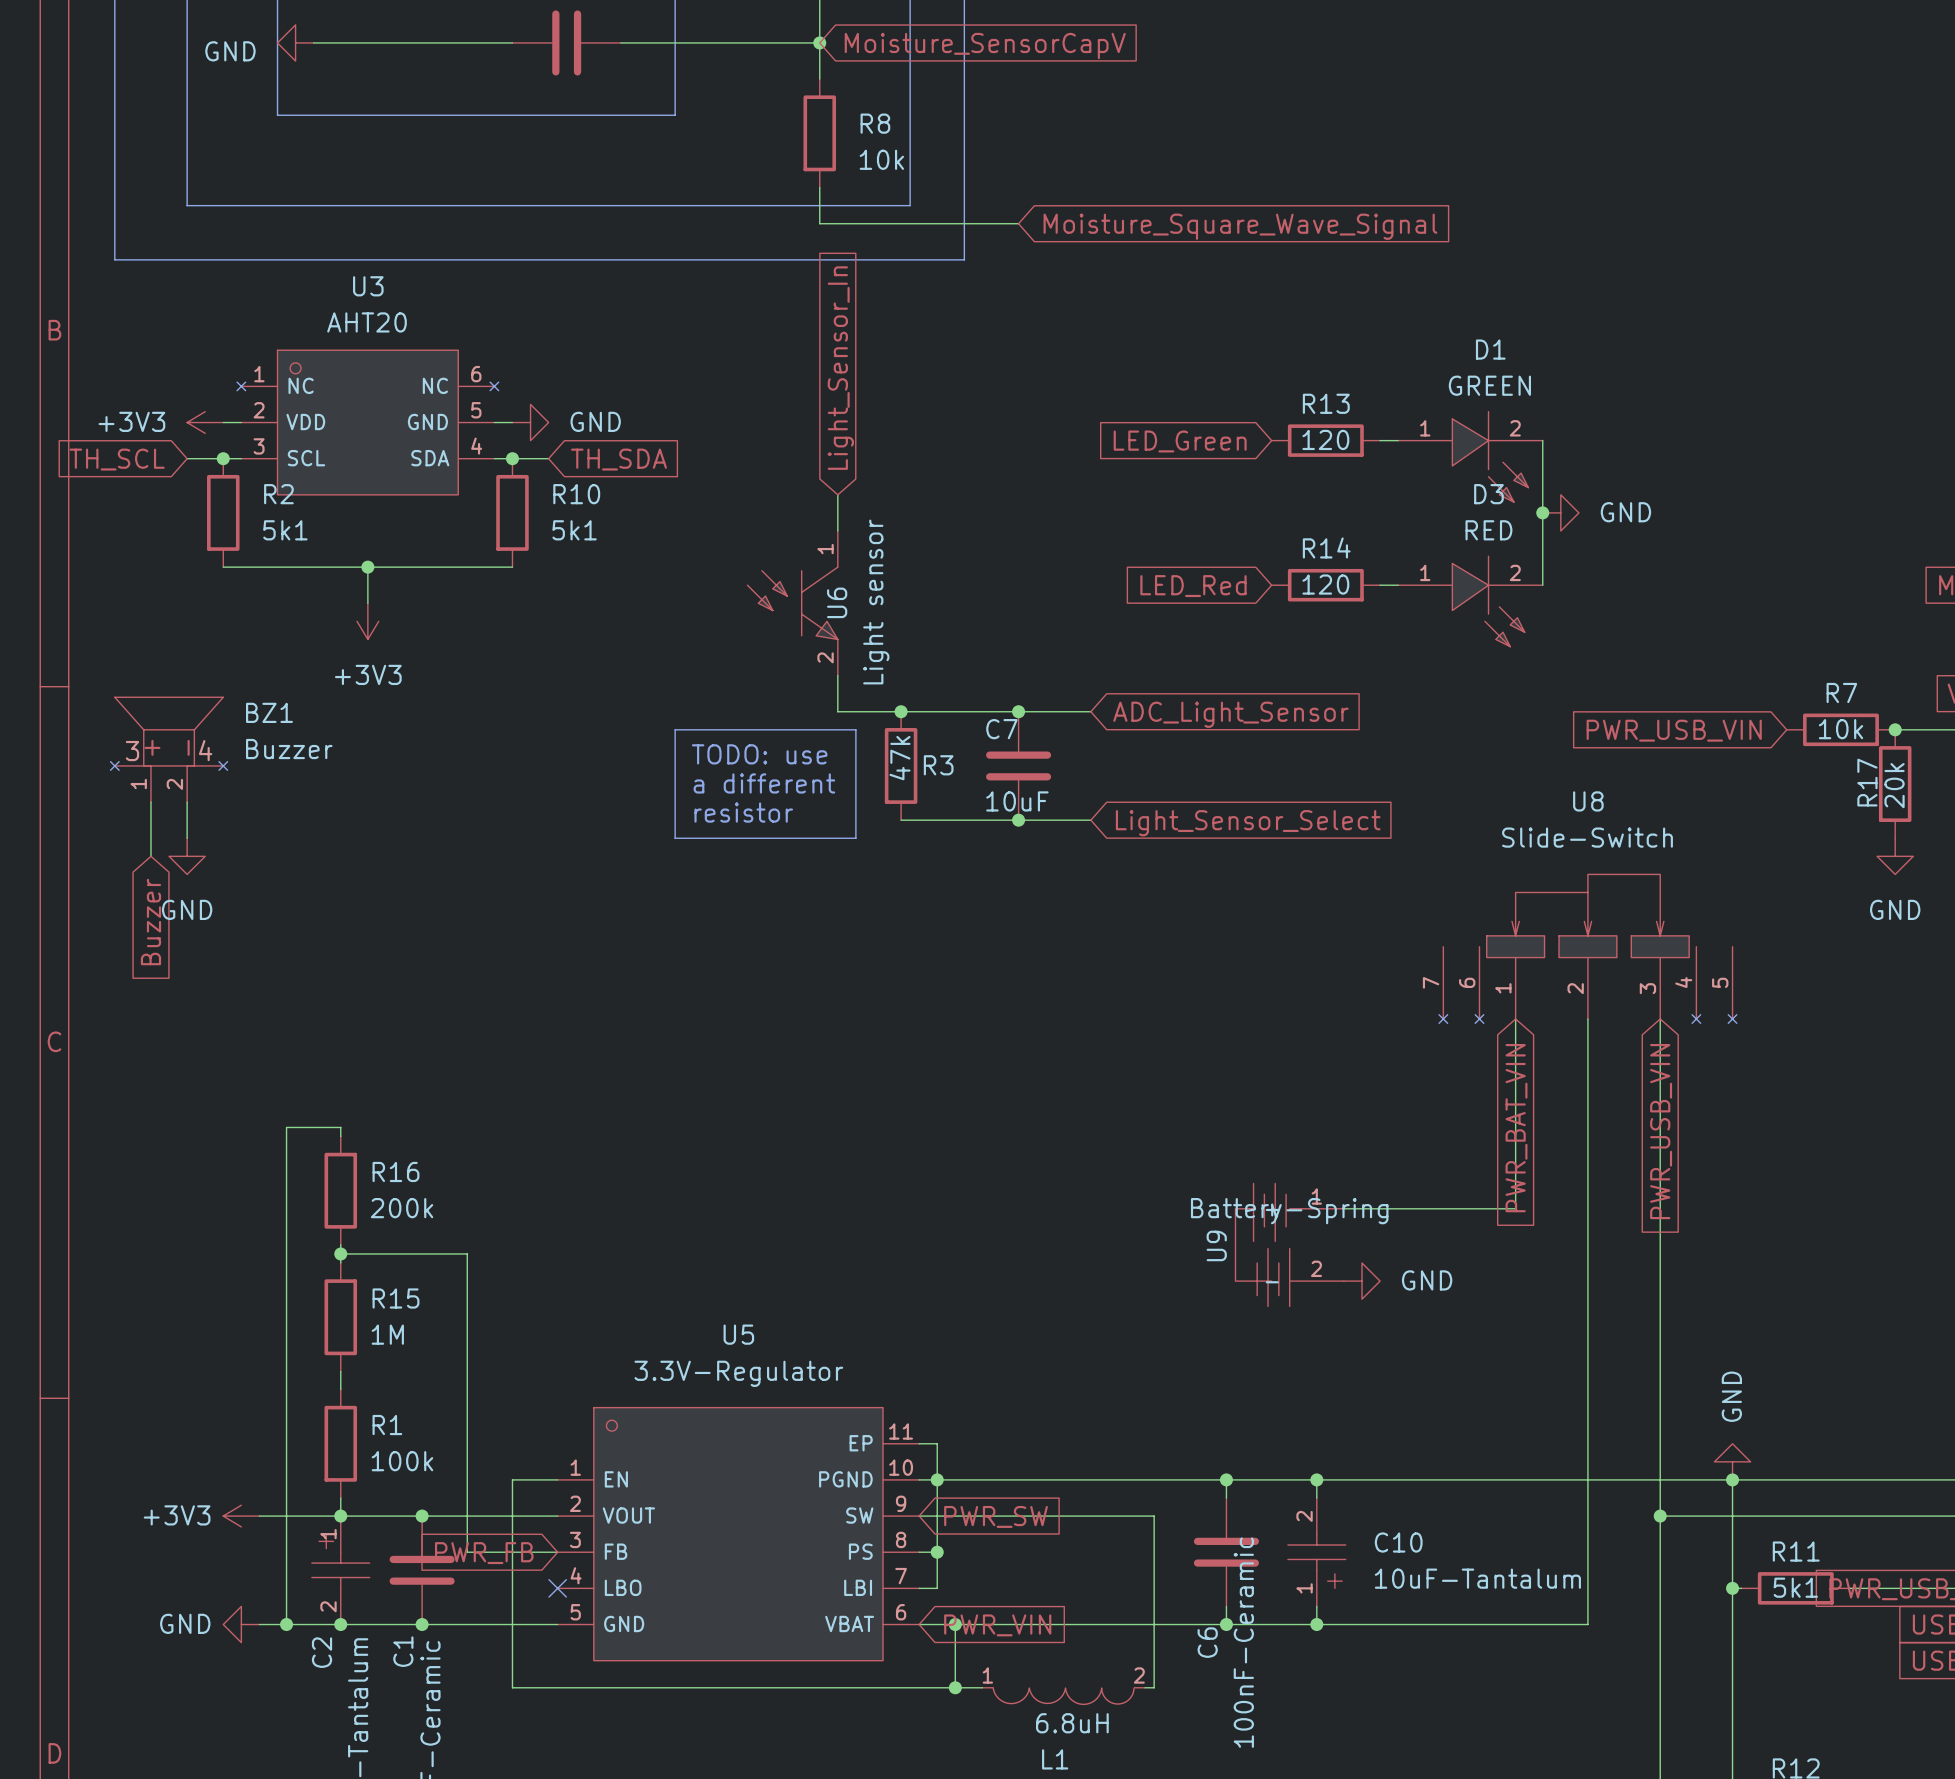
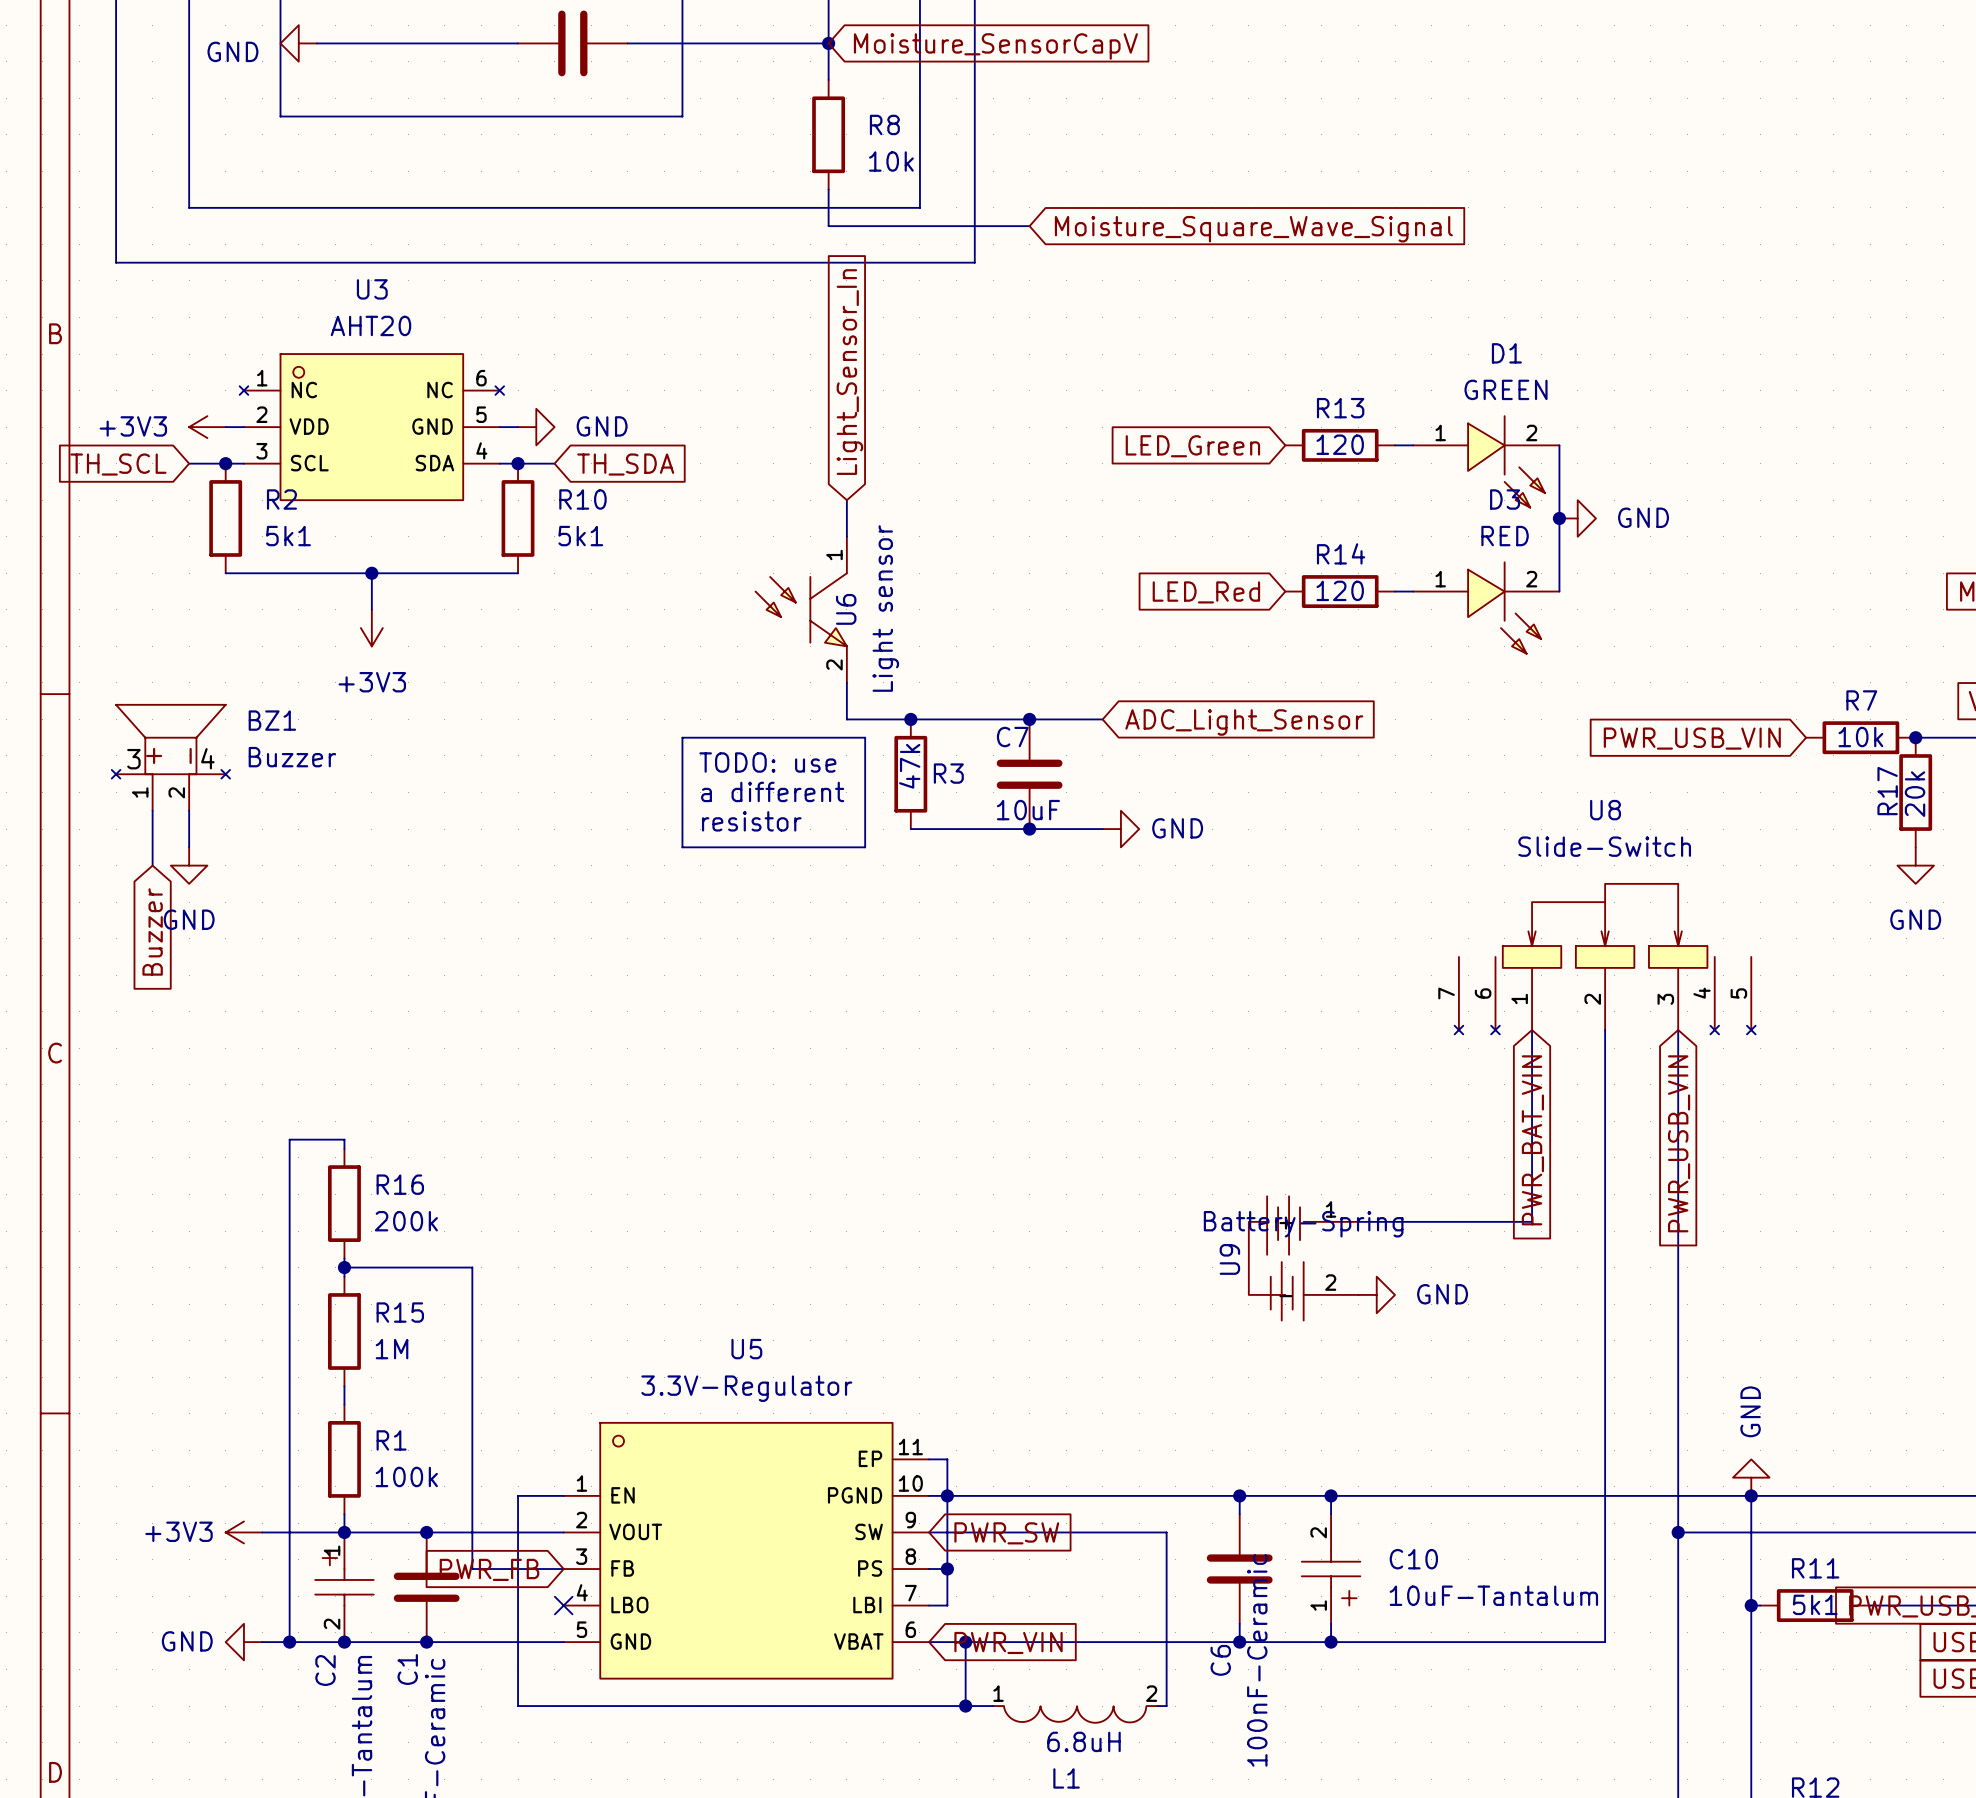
power symbol: none -> GND (1120, 829)
global label: Light_Sensor_Select (1248, 823) -> none

